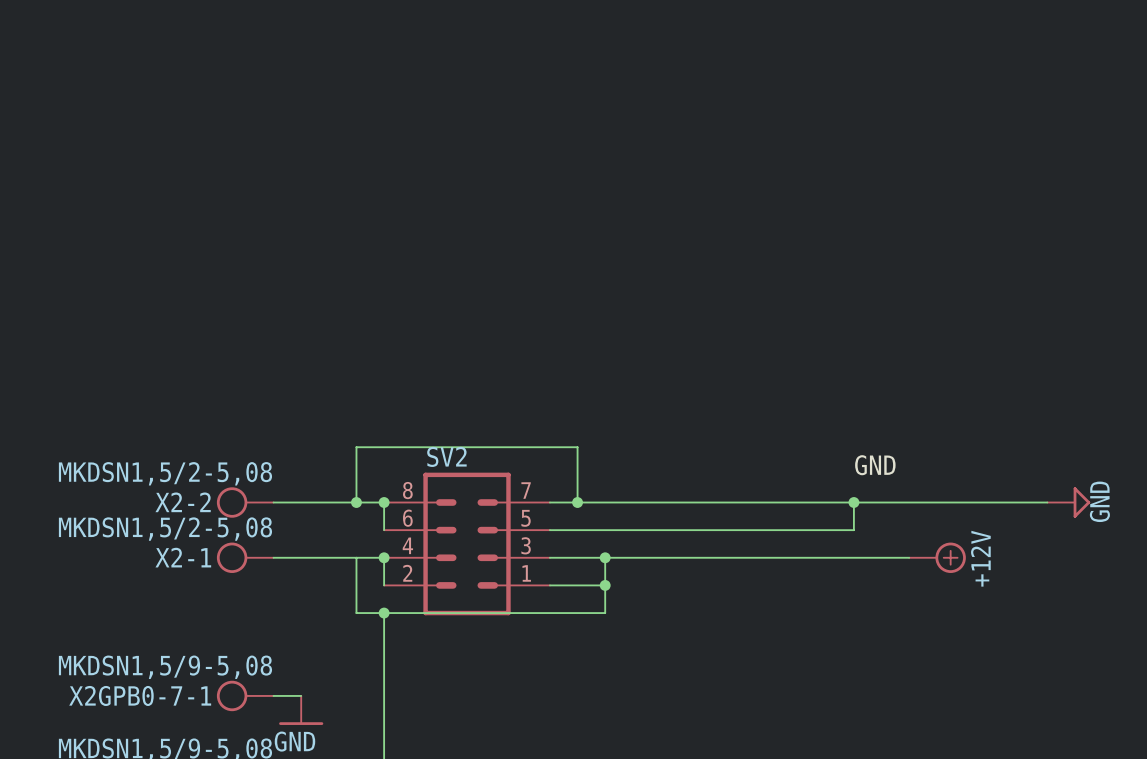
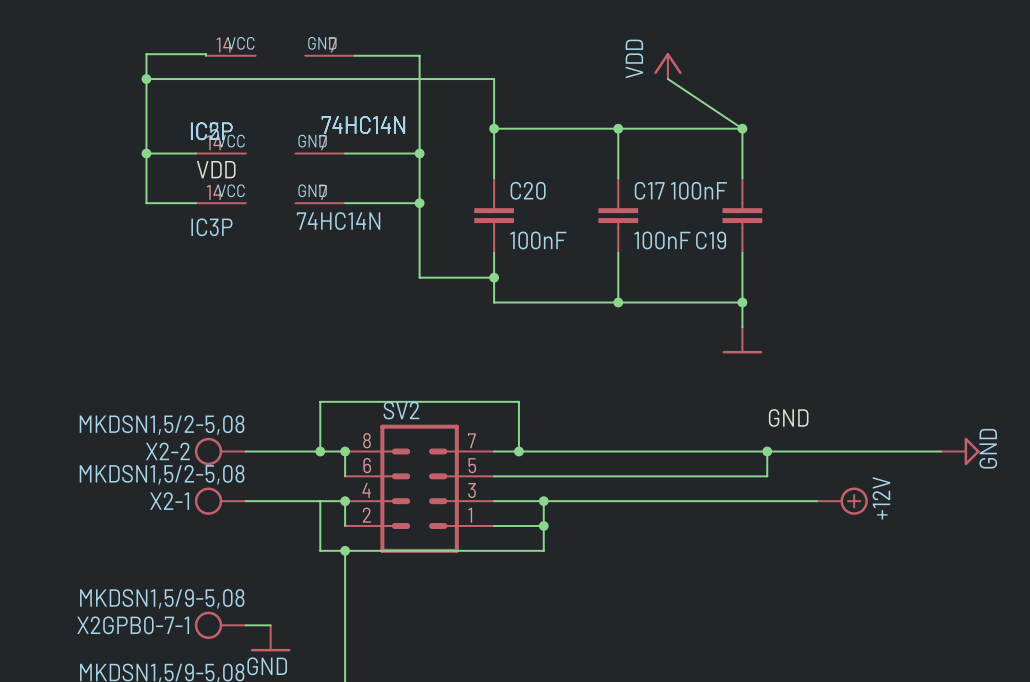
wire: none -> (205, 55) (205, 54) (146, 54) (146, 203) (196, 203)
part: none -> 74HC14N (280, 55)
wire: none -> (354, 55) (419, 55) (419, 277) (494, 277)
power symbol: none -> VDD (667, 65)
wire: none -> (146, 79) (494, 79) (494, 178)
junction: none -> (146, 79)
wire: none -> (667, 79) (742, 128)
wire: none -> (494, 128) (742, 128)
junction: none -> (494, 128)
wire: none -> (618, 128) (618, 178)
junction: none -> (618, 128)
wire: none -> (742, 128) (742, 178)
junction: none -> (742, 128)
wire: none -> (146, 153) (196, 153)
junction: none -> (146, 153)
part: none -> 74HC14N (270, 153)
wire: none -> (345, 153) (419, 153)
junction: none -> (419, 153)
label: none -> VDD (216, 169)
IC3P: none -> 74HC14N (270, 203)
wire: none -> (345, 203) (419, 203)
junction: none -> (419, 203)
C20: none -> 100nF (494, 215)
C17: none -> 100nF (618, 215)
C19: none -> 100nF (742, 215)
wire: none -> (494, 252) (494, 302) (742, 302)
wire: none -> (618, 252) (618, 302)
wire: none -> (742, 252) (742, 327)
junction: none -> (494, 277)
junction: none -> (618, 302)
junction: none -> (742, 302)
power symbol: none -> (742, 340)

